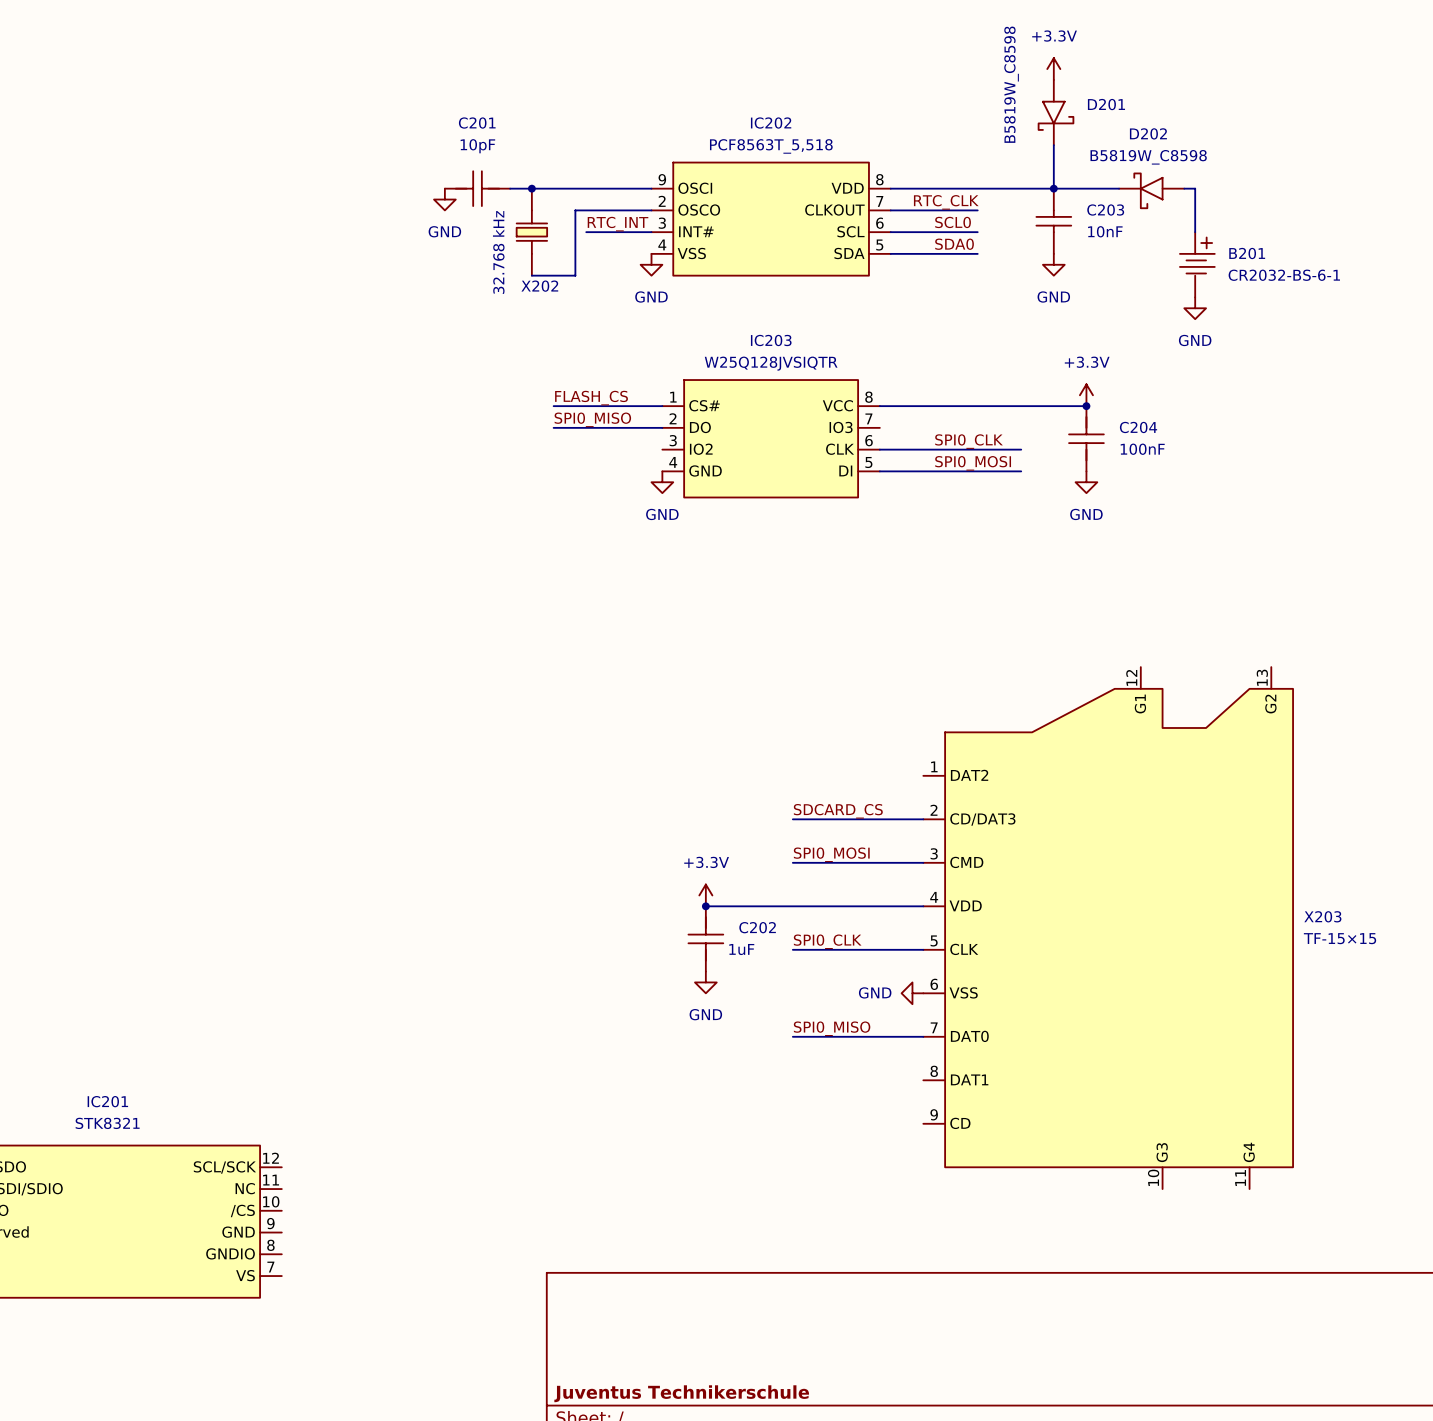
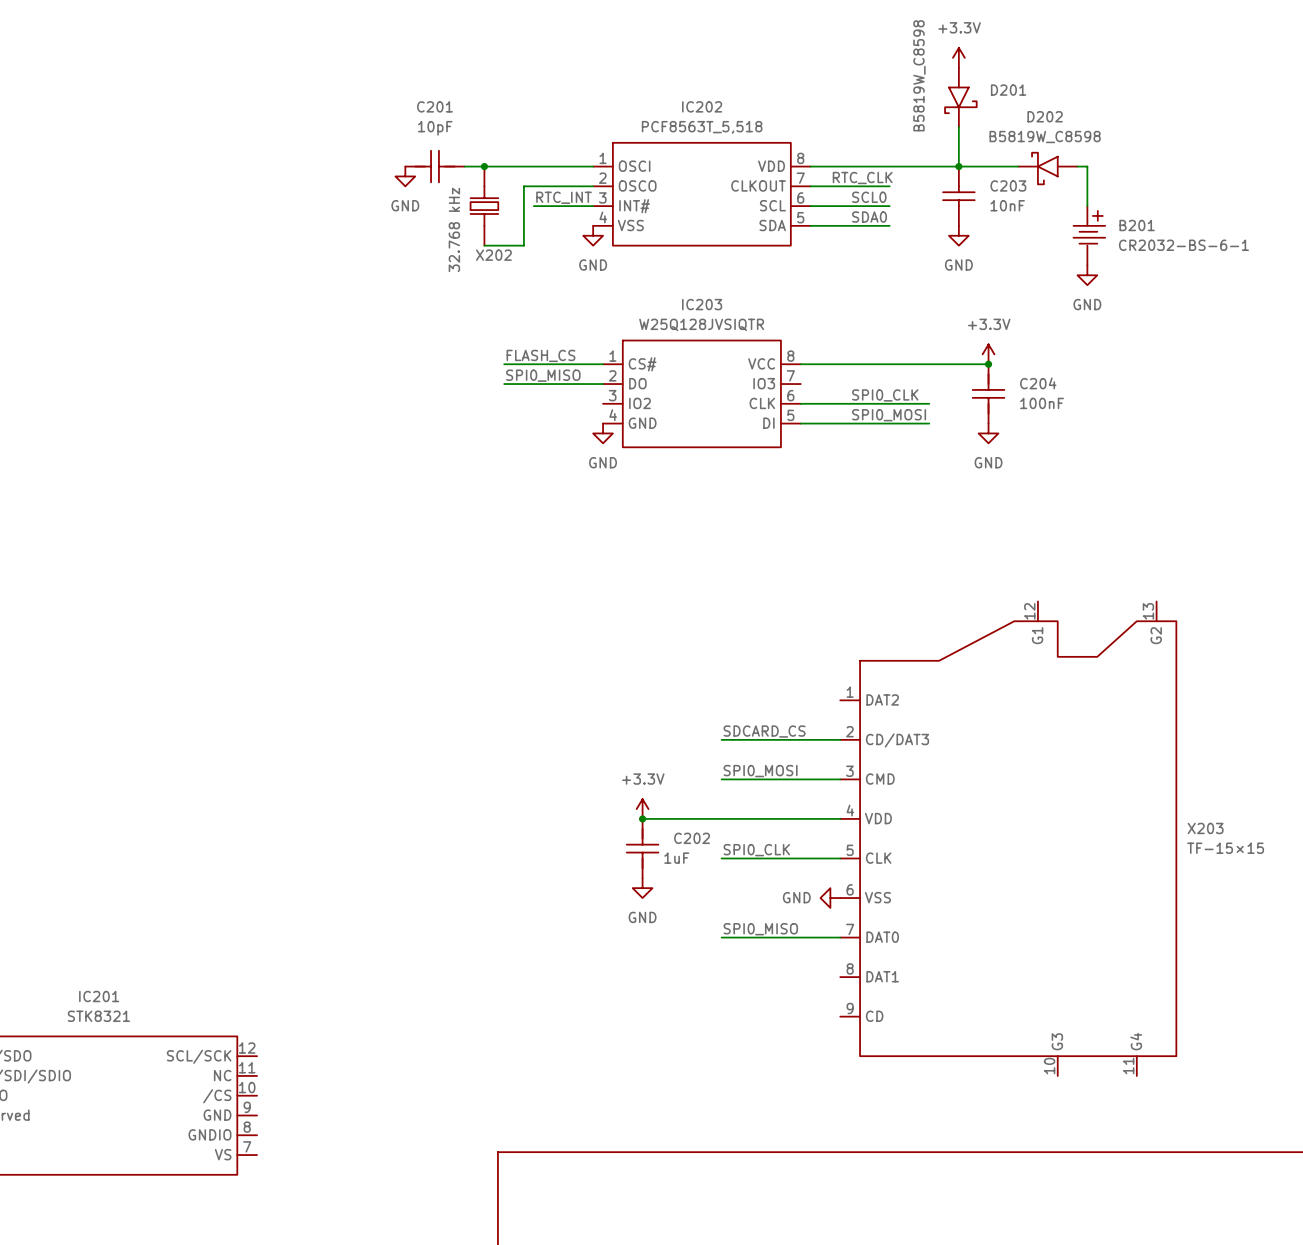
IC202 pin number: 9 (662, 179) -> 1 (603, 158)

